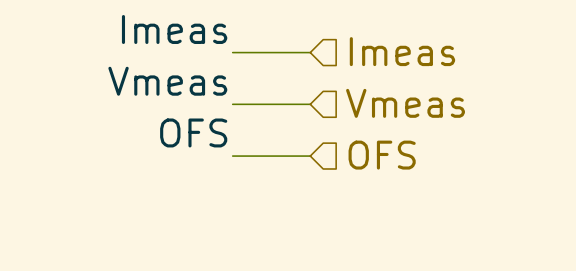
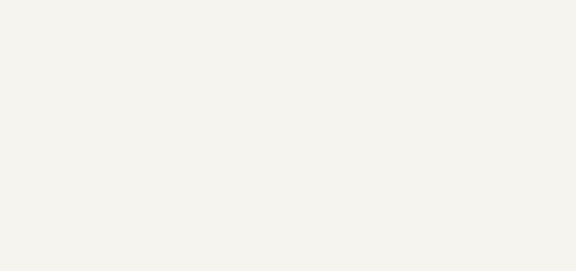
label: Imeas (174, 29) -> none
hierarchical label: Imeas (402, 51) -> none
wire: (232, 52) (310, 52) -> none
label: Vmeas (167, 81) -> none
hierarchical label: Vmeas (405, 103) -> none
wire: (232, 104) (310, 104) -> none
label: OFS (193, 132) -> none
hierarchical label: OFS (382, 155) -> none
wire: (232, 156) (310, 156) -> none

